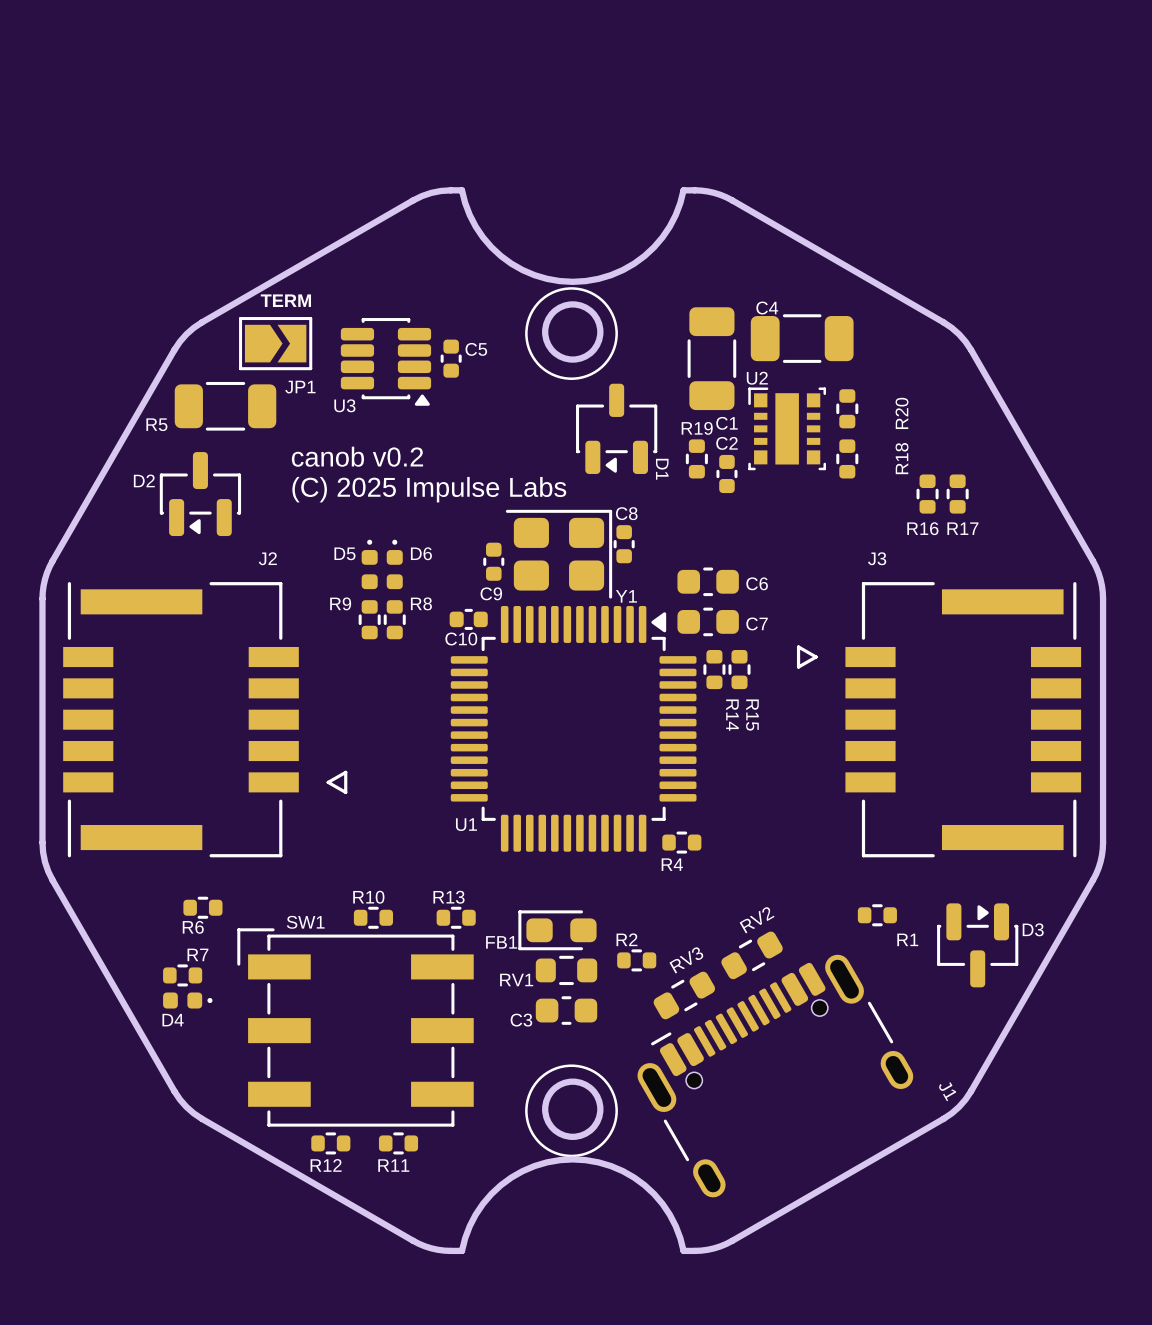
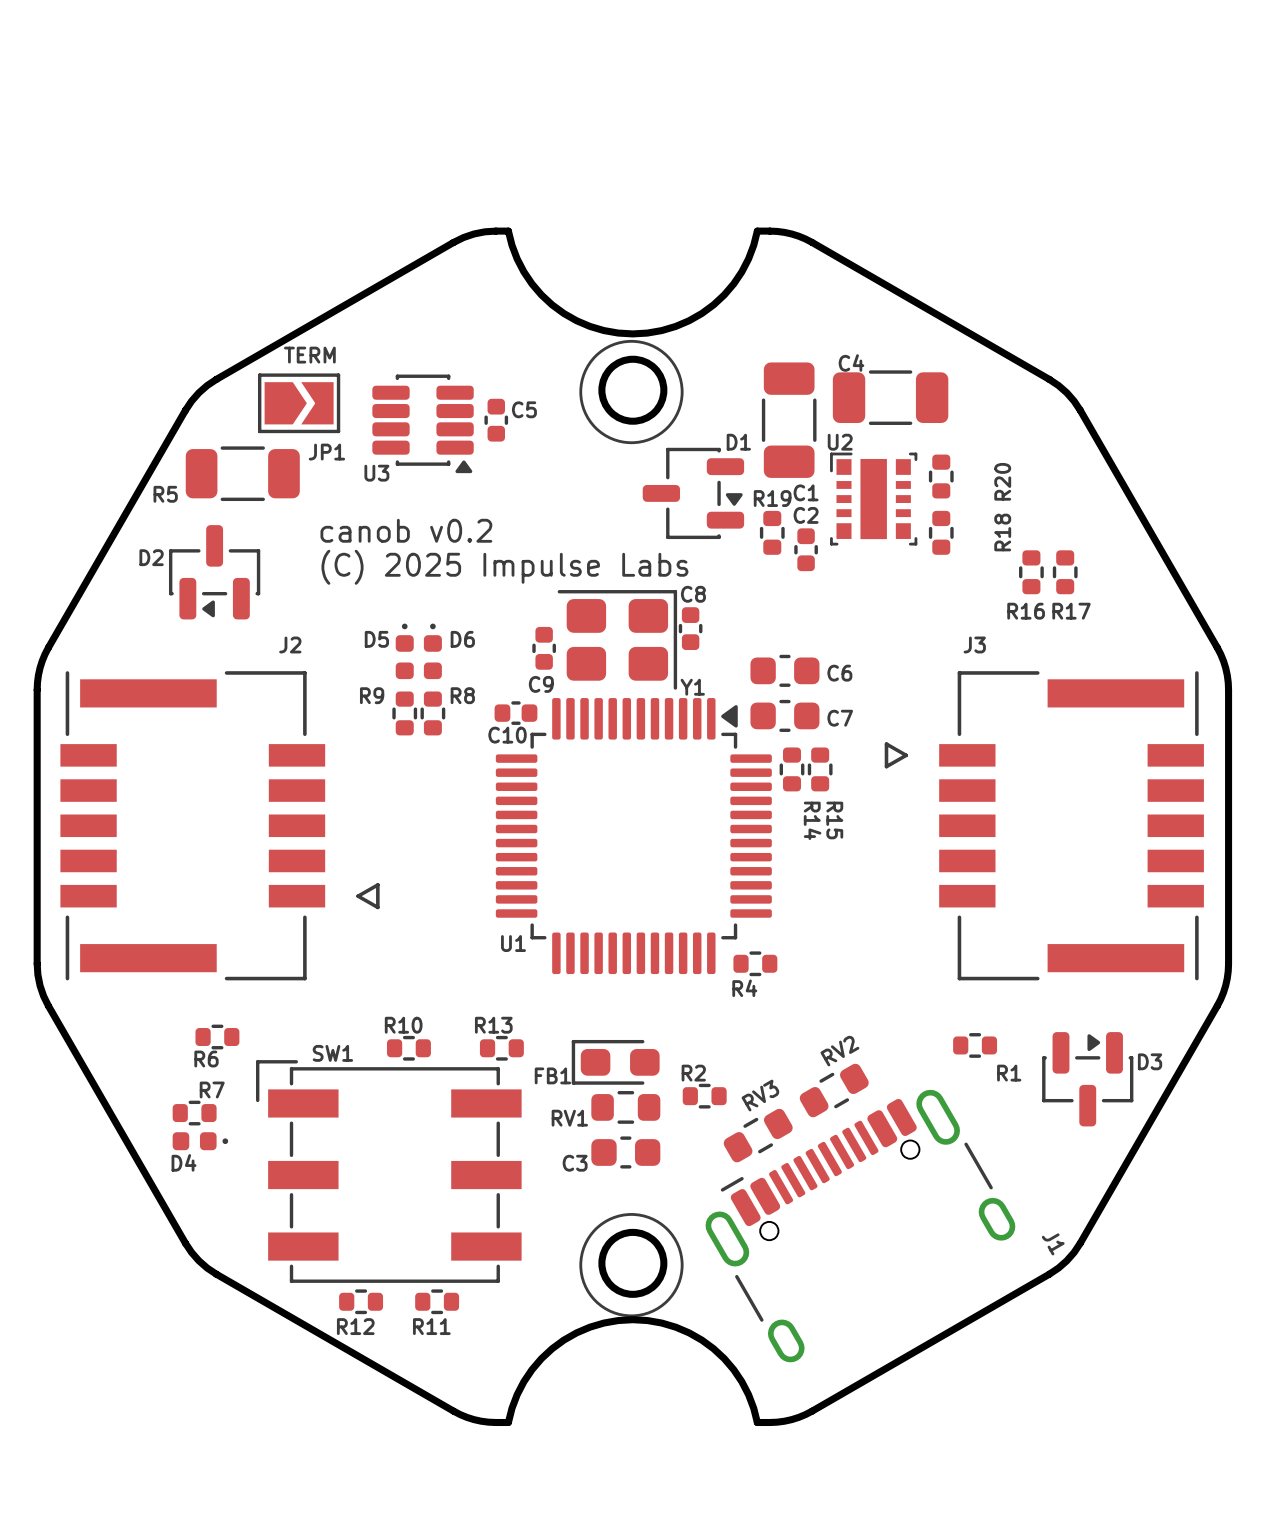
D1 rotation: 0° (616, 428) -> 90° counterclockwise (693, 493)

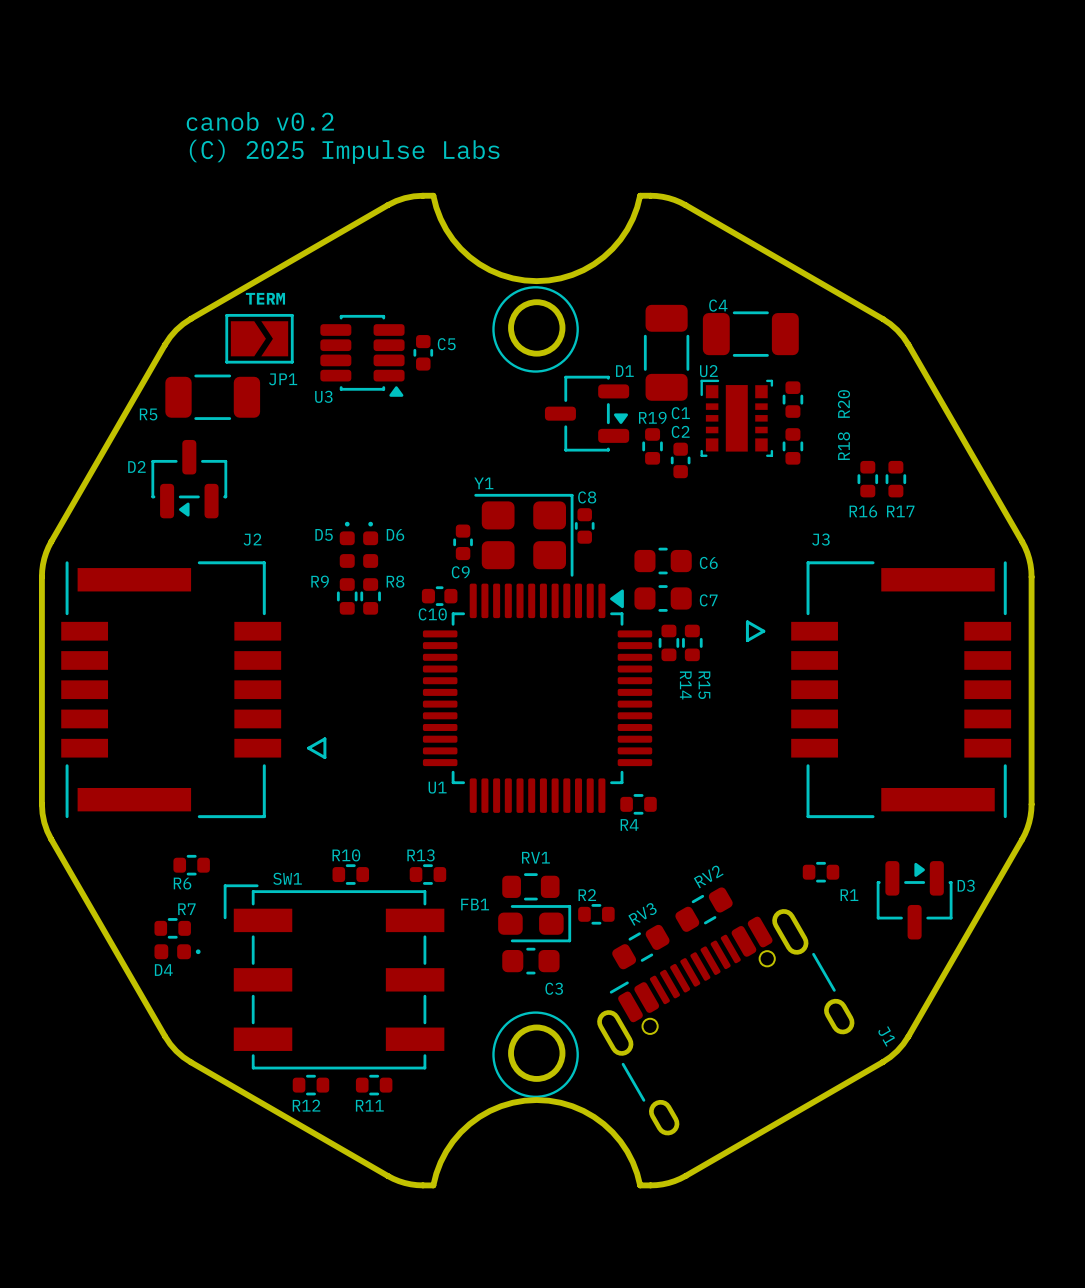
text position: canob v0.2 (406, 530) -> canob v0.2 (260, 121)
text position: (C) 2025 Impulse Labs (504, 567) -> (C) 2025 Impulse Labs (344, 151)
Y1 name position: Y1 (692, 687) -> Y1 (483, 483)
FB1 rotation: 0° (615, 1062) -> 180° (534, 923)
RV1 position: (625, 1107) -> (530, 886)
RV1 name position: RV1 (569, 1118) -> RV1 (535, 857)
C3 name position: C3 (575, 1163) -> C3 (554, 988)

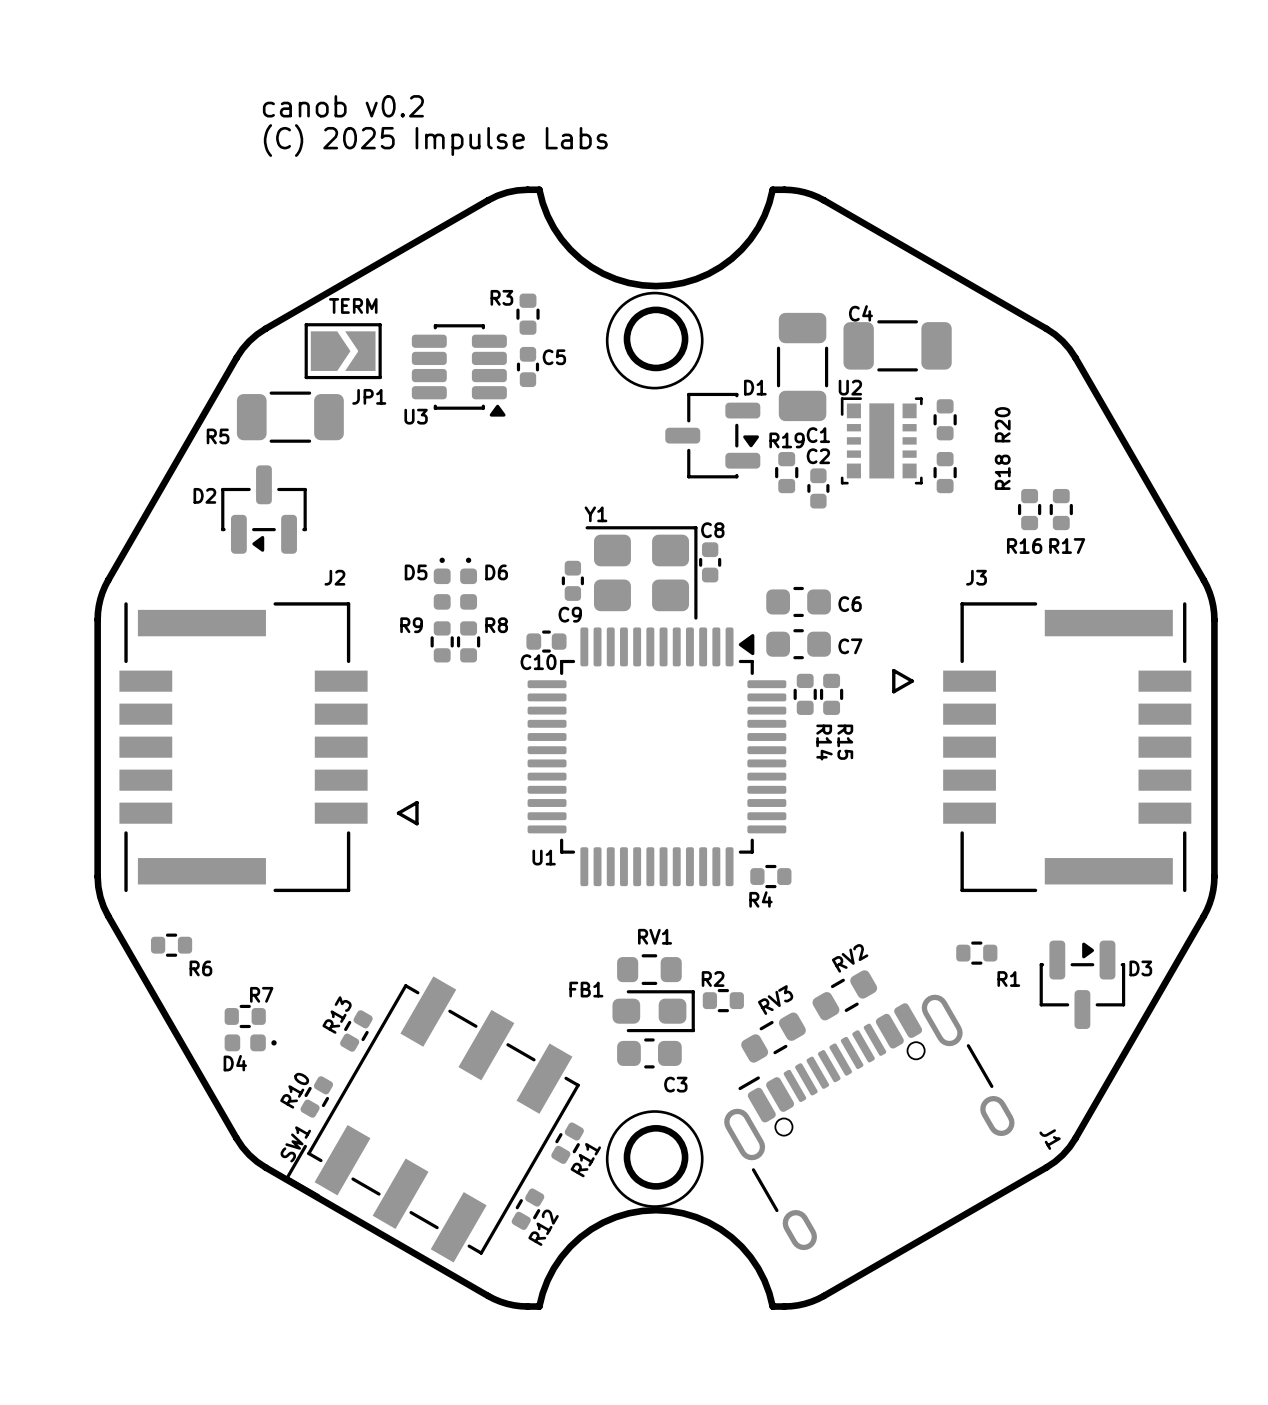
R3: none -> (527, 314)
R6 position: (191, 865) -> (171, 945)
R10 rotation: 0° (350, 874) -> 60° counterclockwise (316, 1096)
R10 position: (350, 874) -> (316, 1096)
R13 rotation: 0° (427, 874) -> 60° counterclockwise (356, 1030)
R13 position: (427, 874) -> (356, 1030)
R6 name position: R6 (182, 883) -> R6 (200, 968)
SW1 rotation: 0° (334, 976) -> 60° counterclockwise (432, 1119)
R12 rotation: 0° (310, 1085) -> 60° counterclockwise (527, 1209)
R12 position: (310, 1085) -> (527, 1209)
R11 rotation: 0° (374, 1085) -> 60° counterclockwise (567, 1143)
R11 position: (374, 1085) -> (567, 1143)

